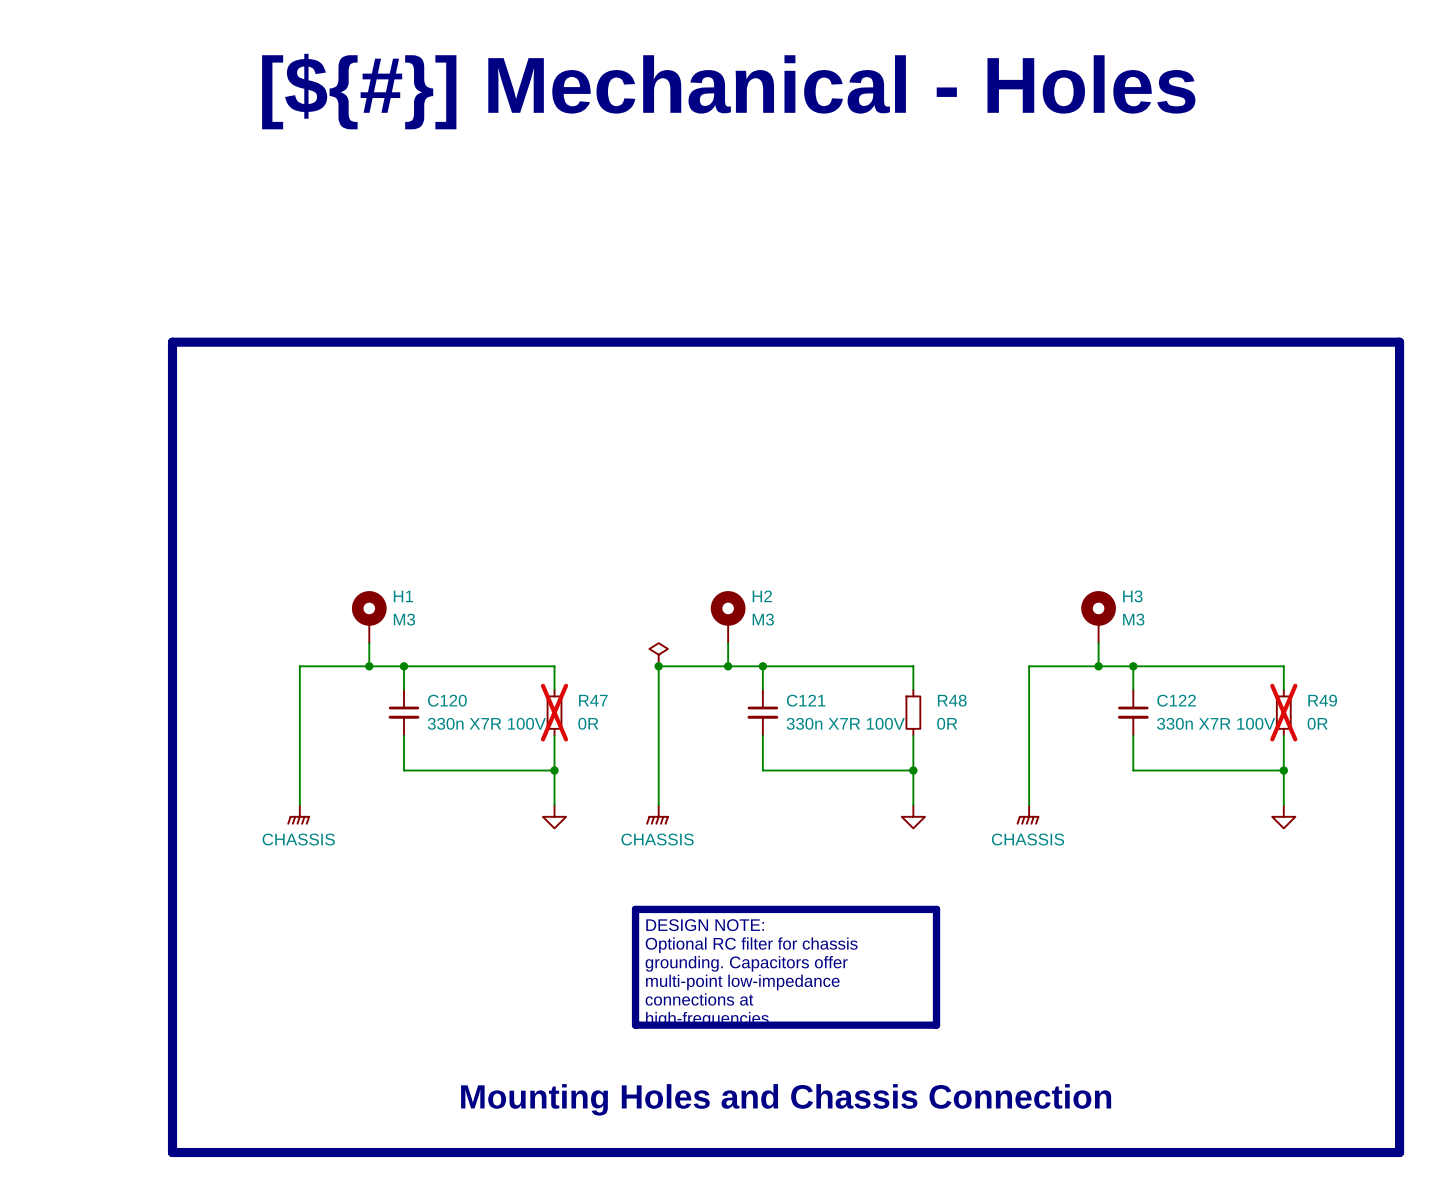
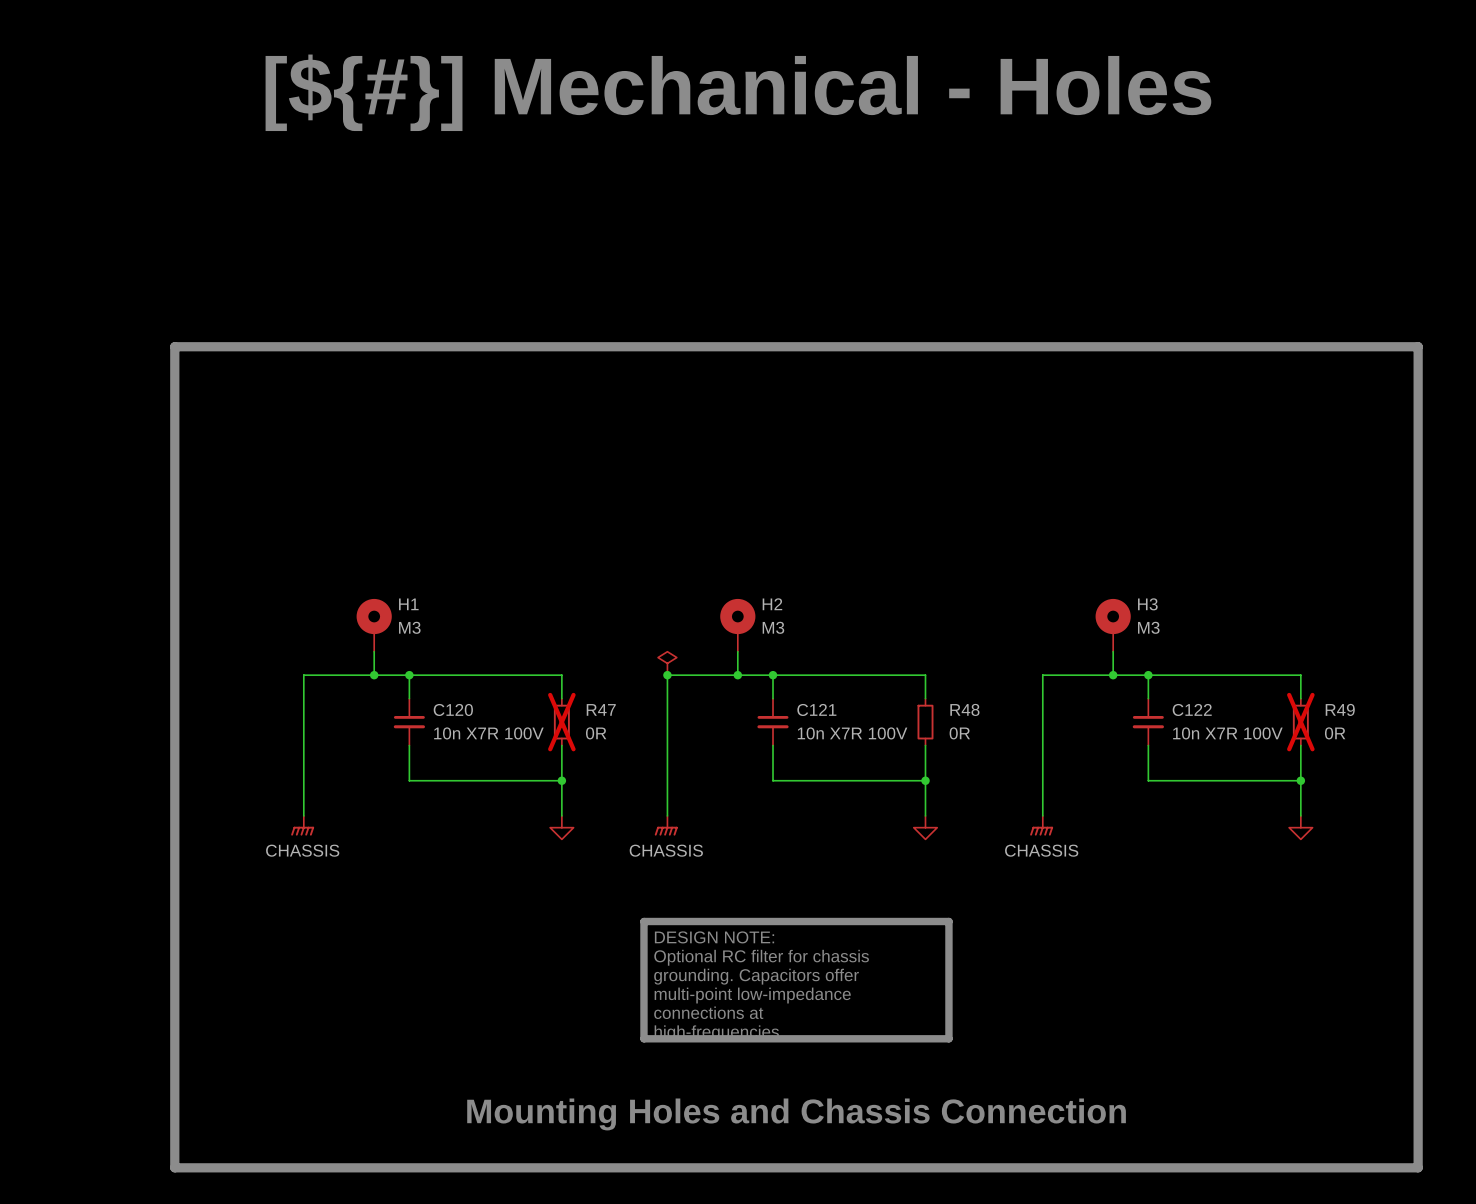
C120 value: 330n X7R 100V (486, 723) -> 10n X7R 100V (488, 733)
C121 value: 330n X7R 100V (845, 723) -> 10n X7R 100V (852, 733)
C122 value: 330n X7R 100V (1216, 723) -> 10n X7R 100V (1227, 733)

